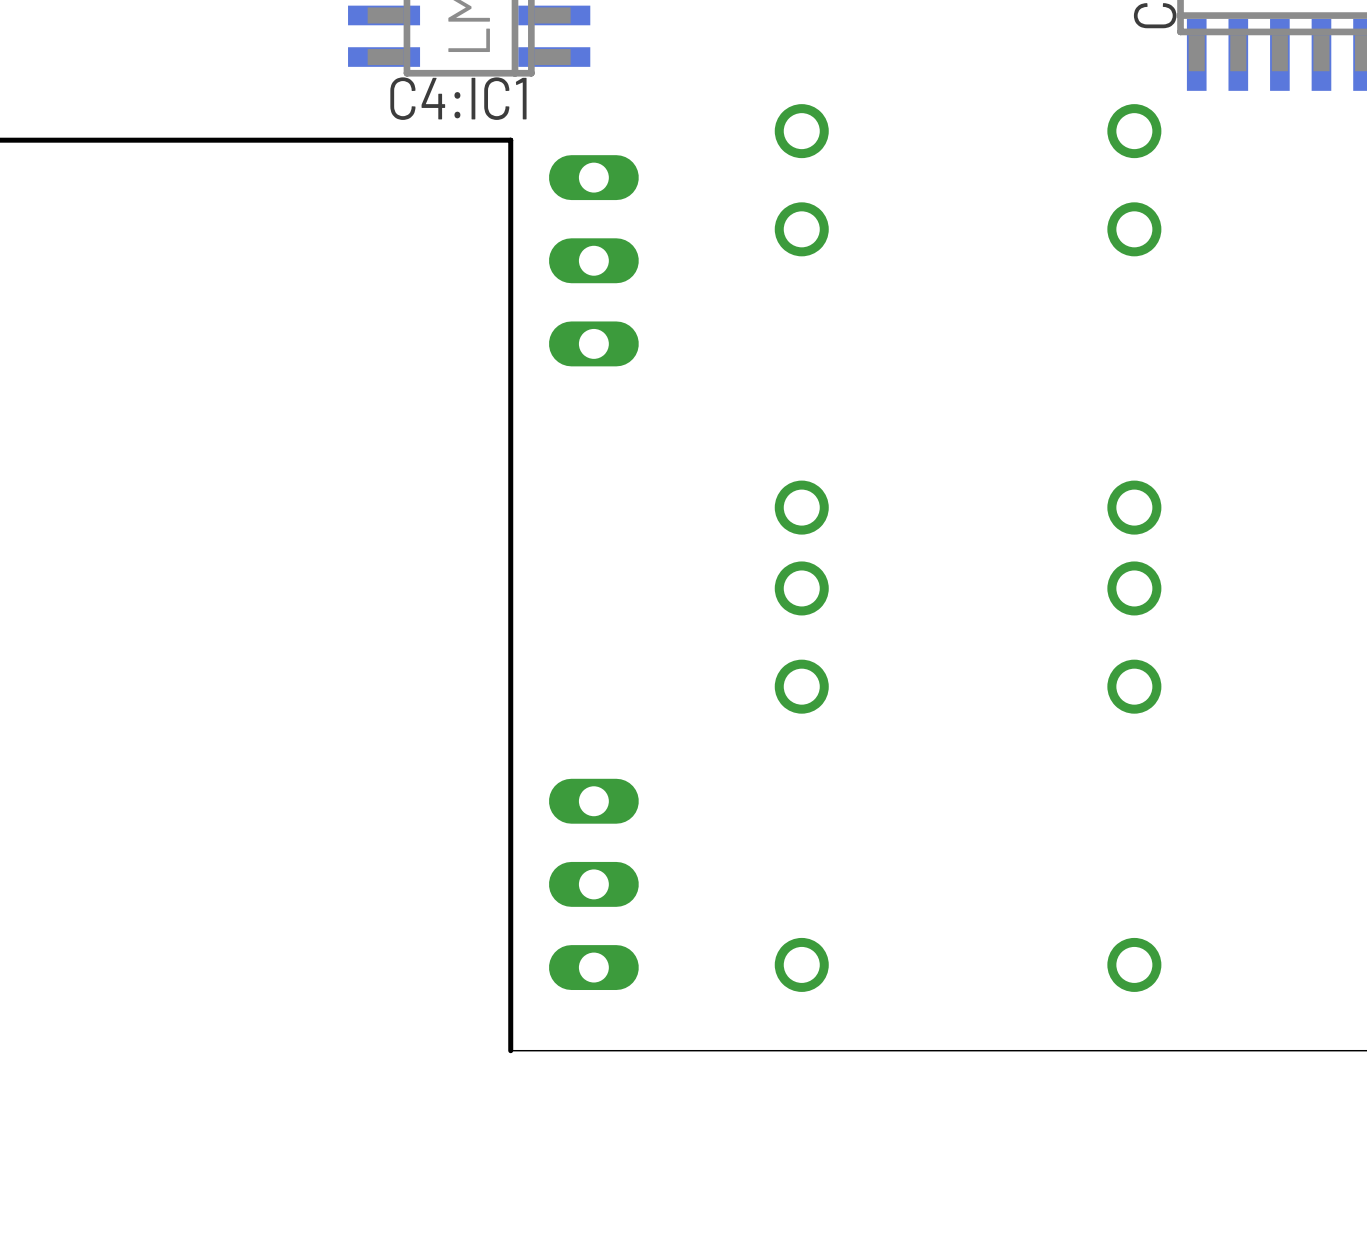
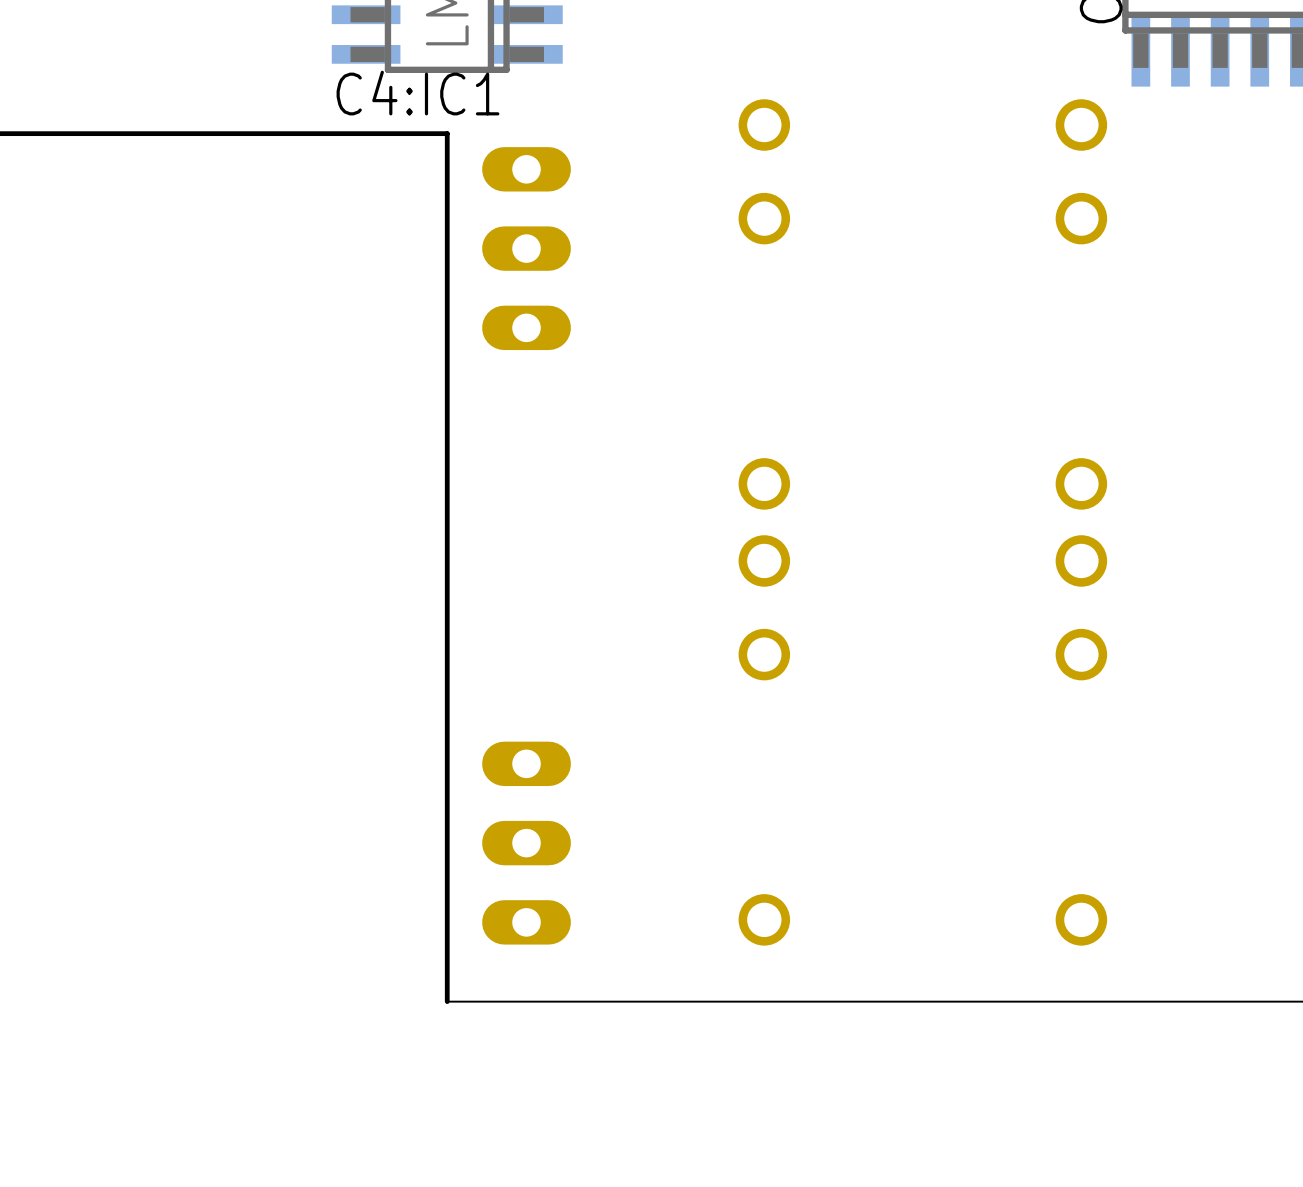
board edge: (469, 140) (510, 140) (510, 1050) -> (447, 133) (447, 1001) (486, 1001)
part: none -> (526, 248)
part: (593, 260) -> none
part: none -> (526, 843)
part: (593, 884) -> none

